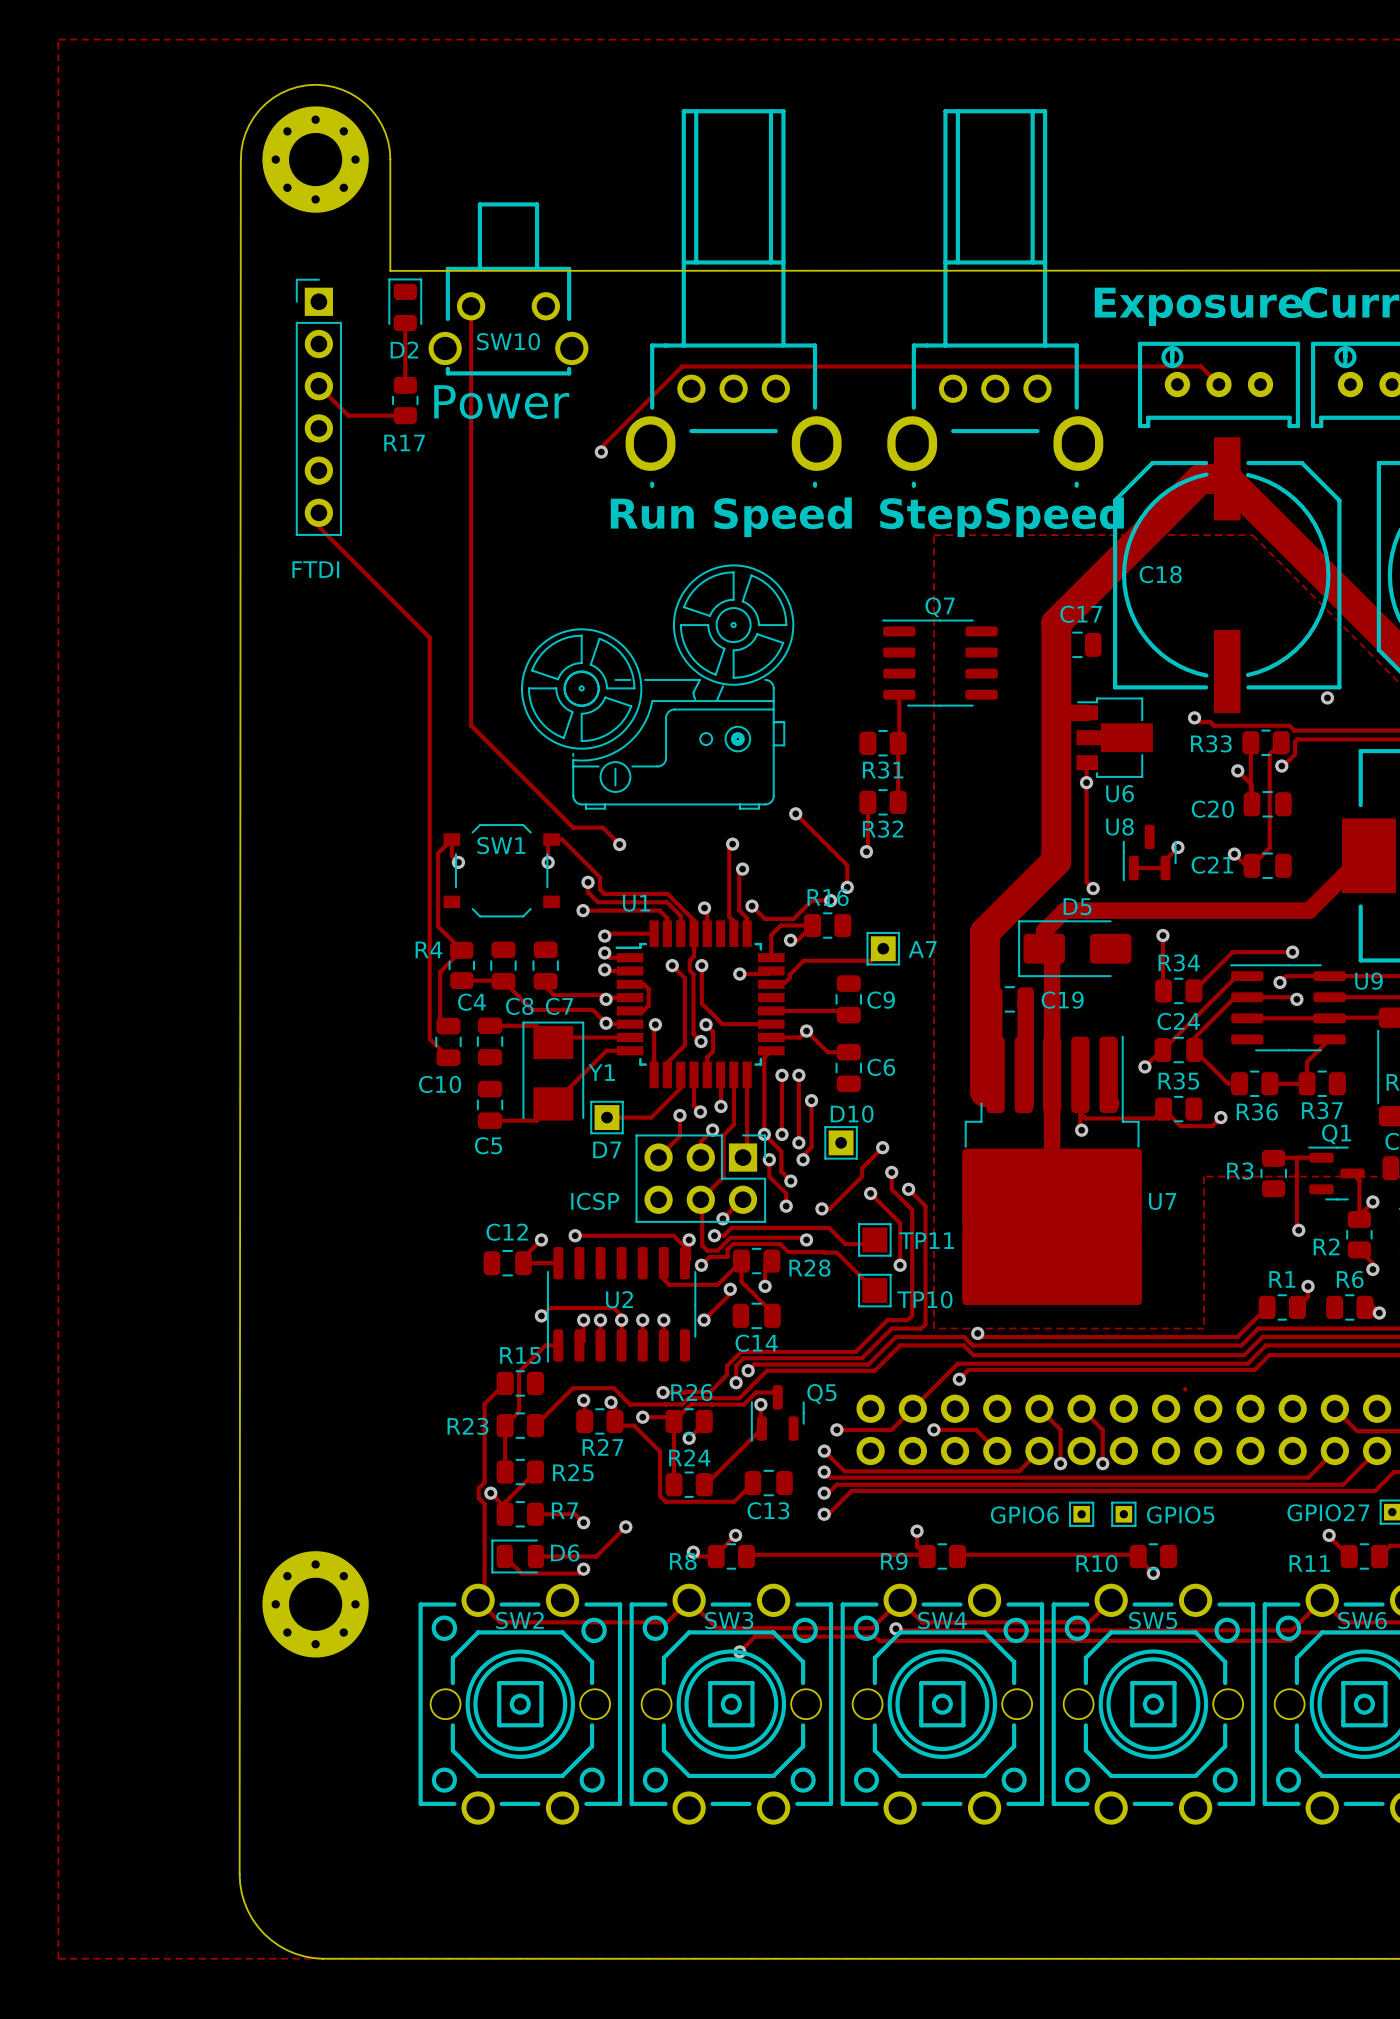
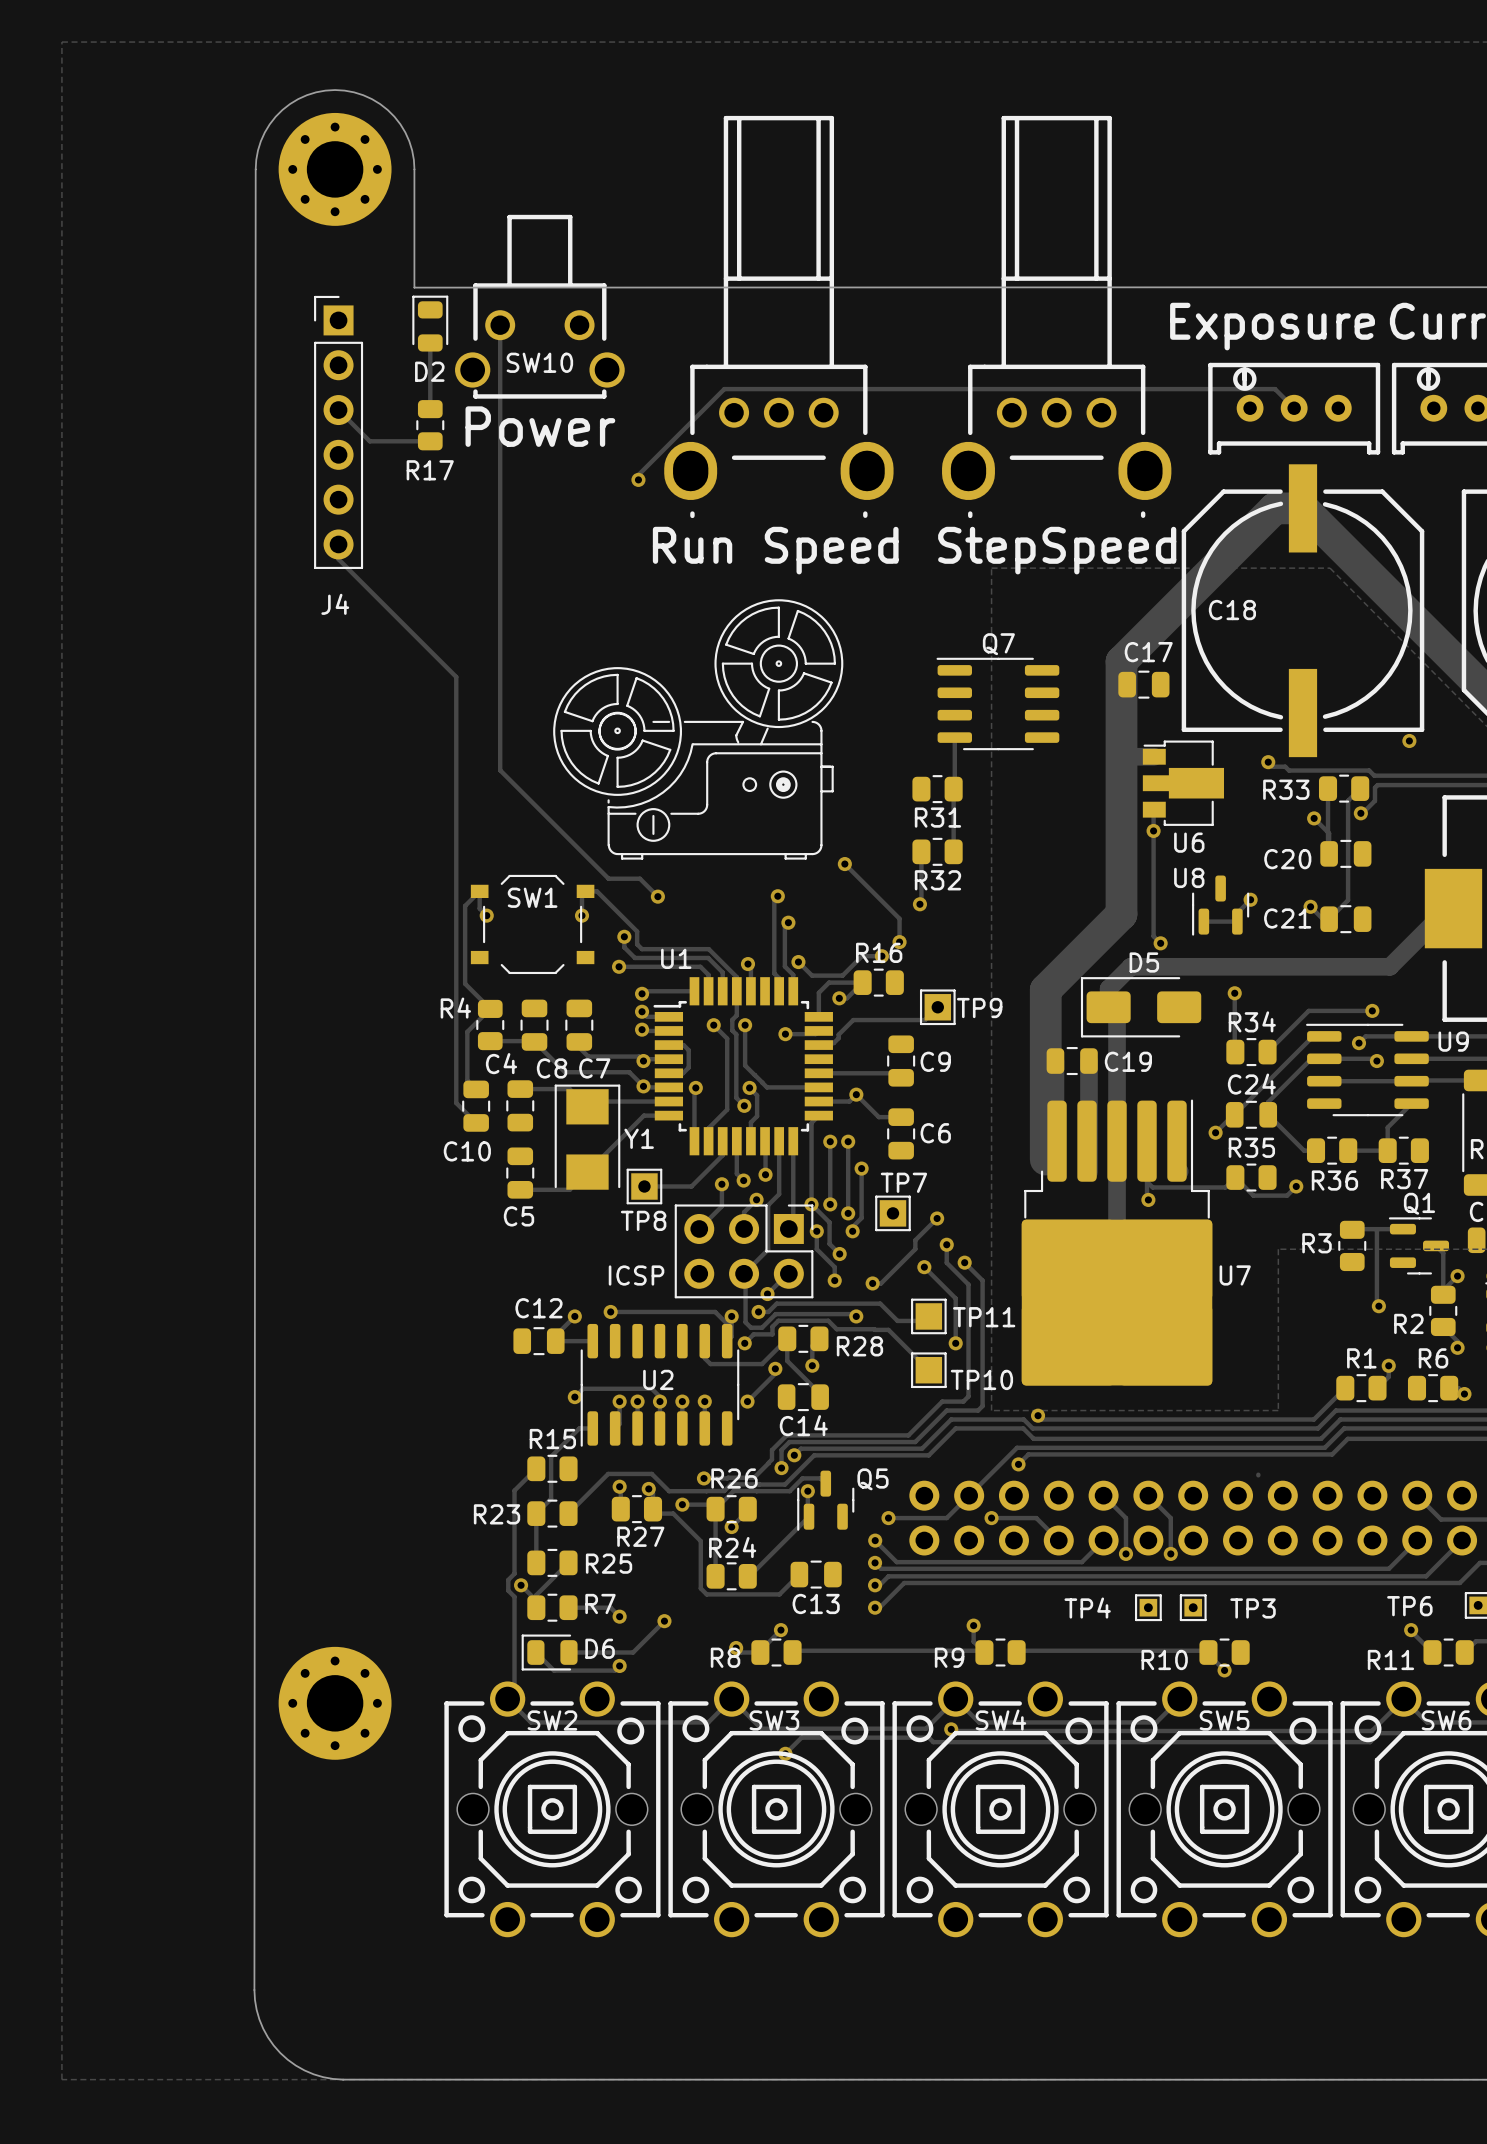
FTDI name: FTDI (315, 569) -> J4 (335, 604)
A7 name: A7 (922, 949) -> TP9 (979, 1008)
D10 name: D10 (852, 1114) -> TP7 (903, 1182)
D7 name: D7 (607, 1149) -> TP8 (643, 1220)
GPIO27 name: GPIO27 (1328, 1512) -> TP6 (1409, 1606)
GPIO6 name: GPIO6 (1024, 1514) -> TP4 (1087, 1608)
GPIO5 name: GPIO5 (1180, 1514) -> TP3 (1253, 1608)

